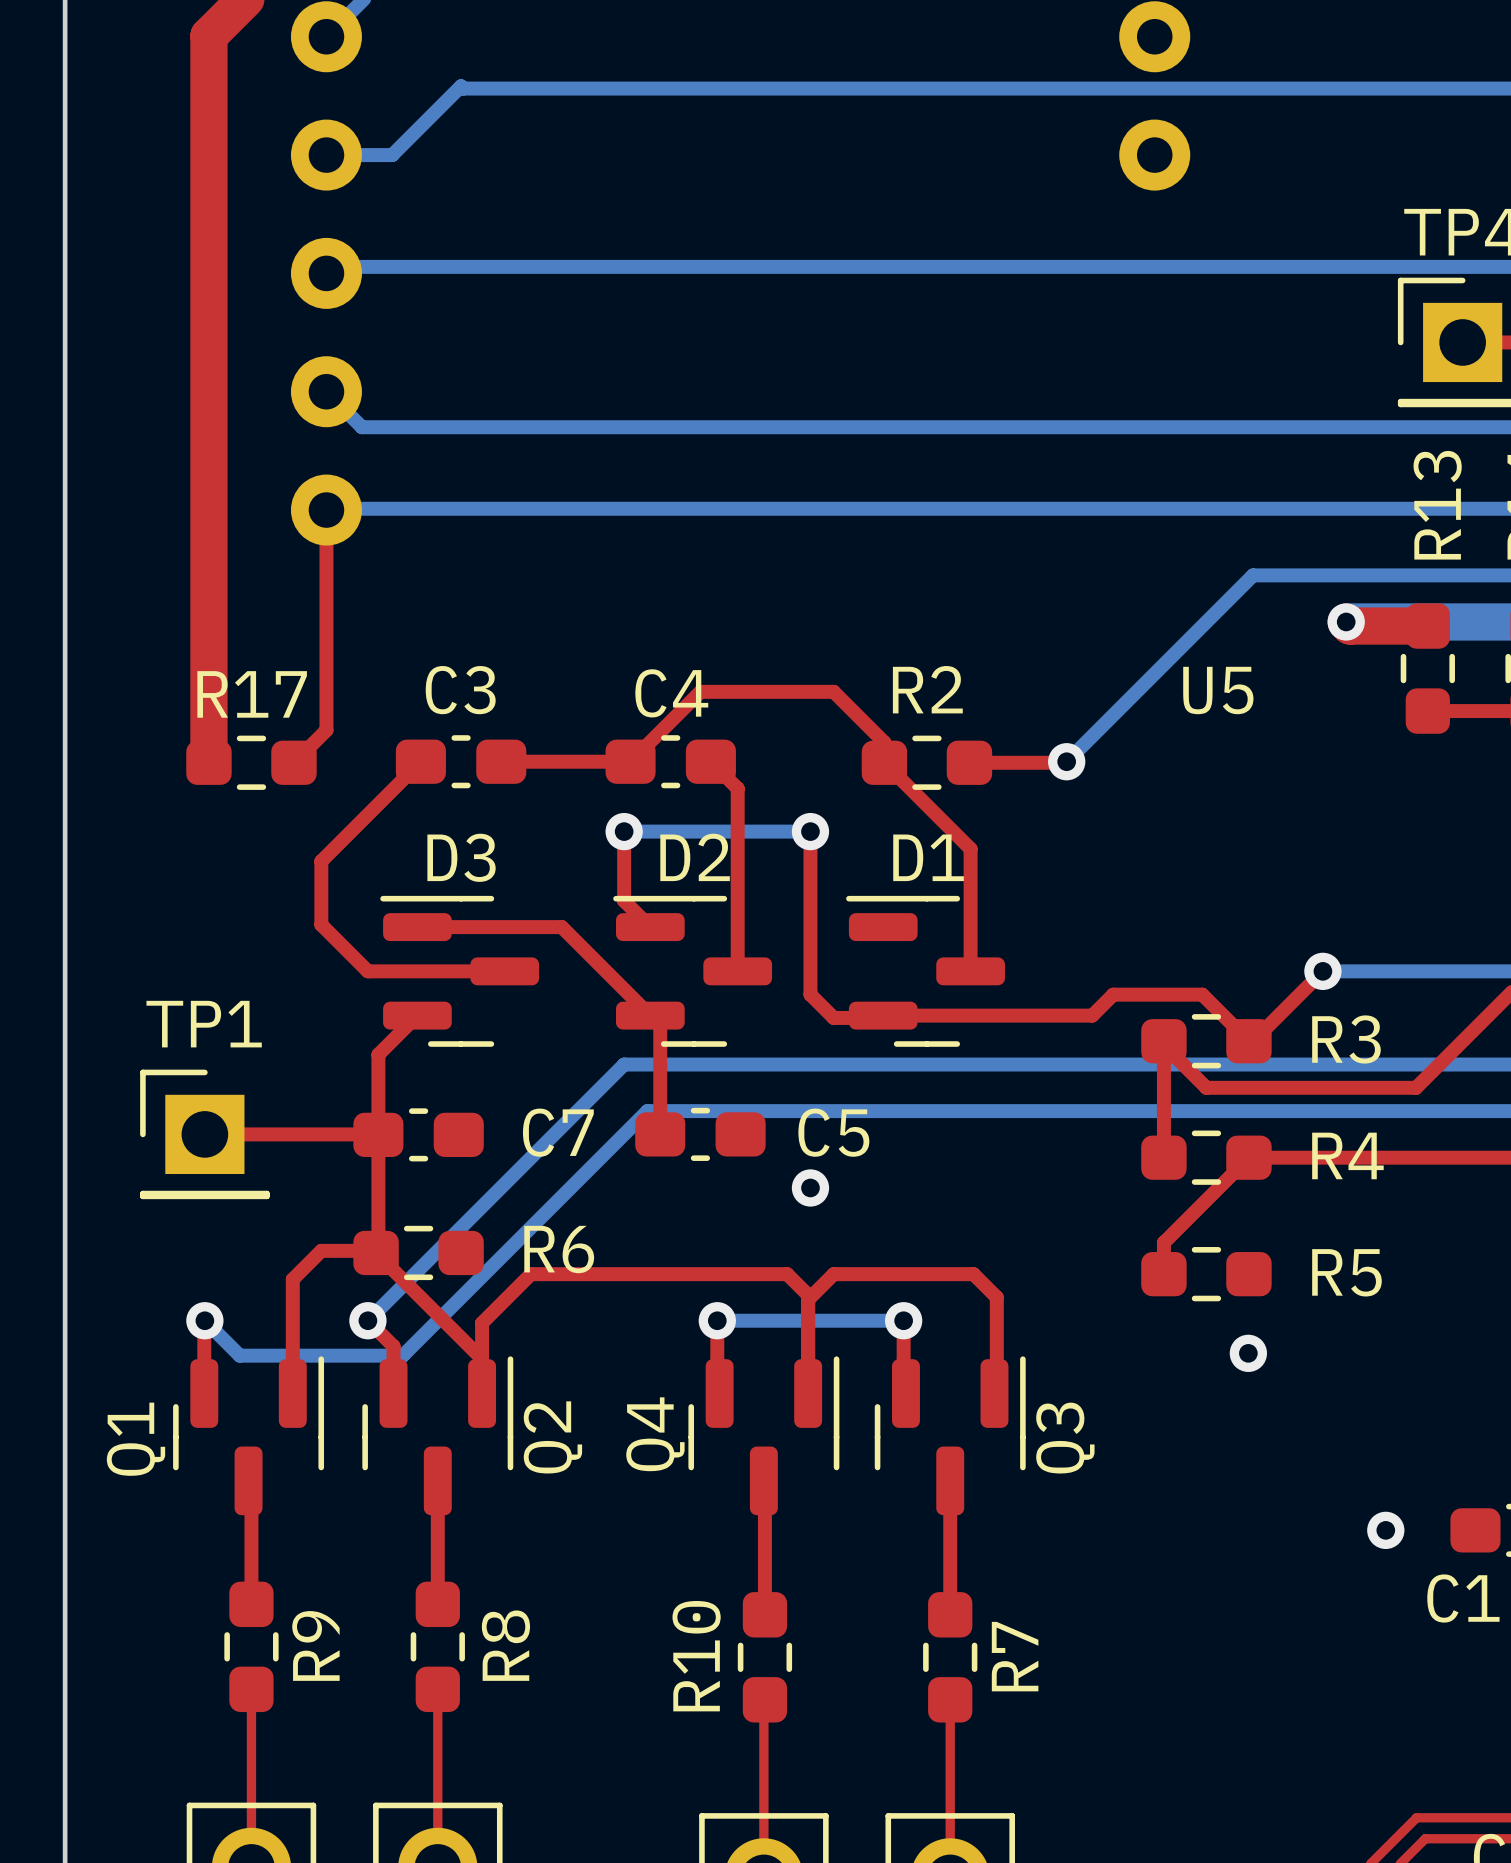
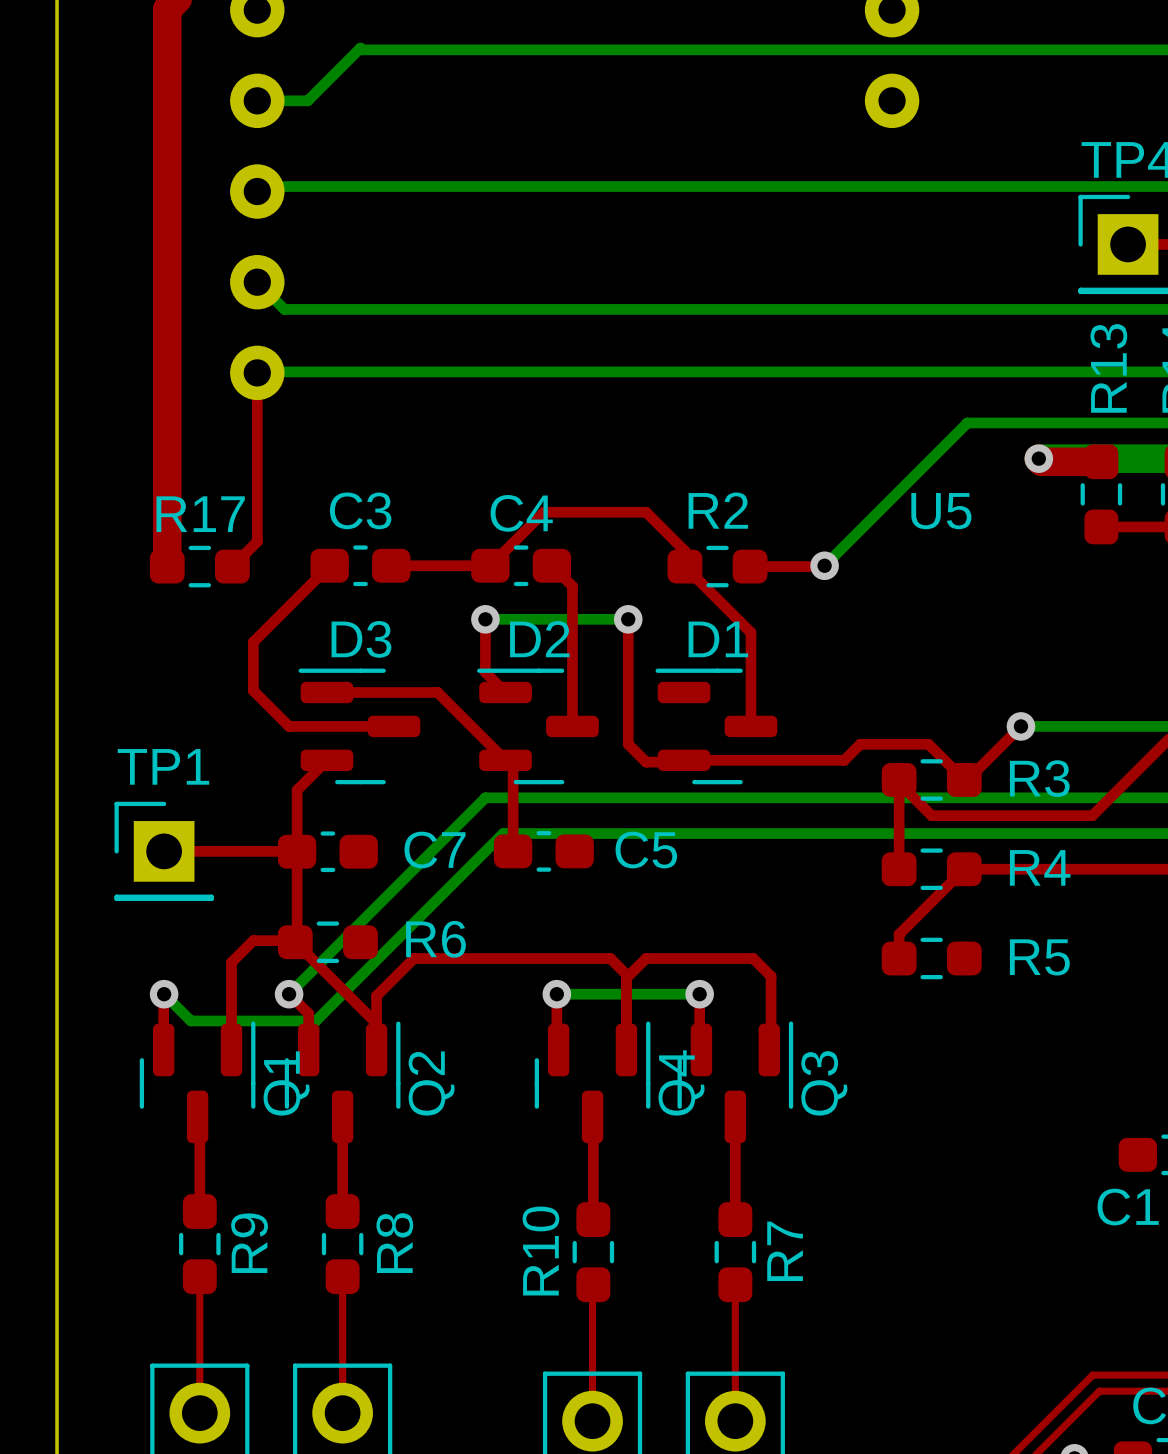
via: (810, 1187) -> none
via: (1248, 1353) -> none
Q4 name position: Q4 (655, 1434) -> Q4 (681, 1082)
Q1 name position: Q1 (136, 1439) -> Q1 (286, 1083)
via: (1385, 1530) -> none

